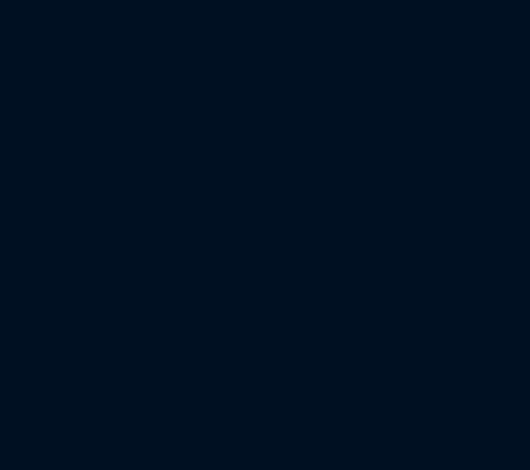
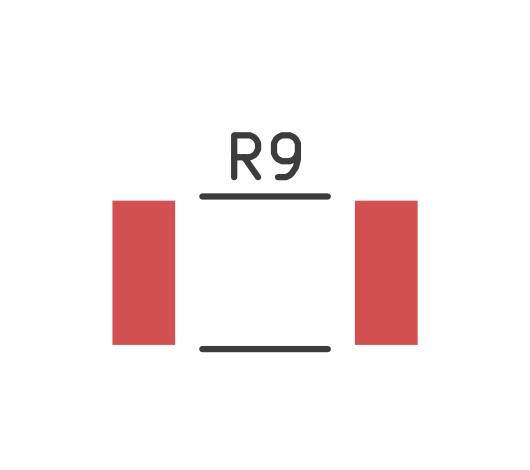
R9: none -> (265, 272)

